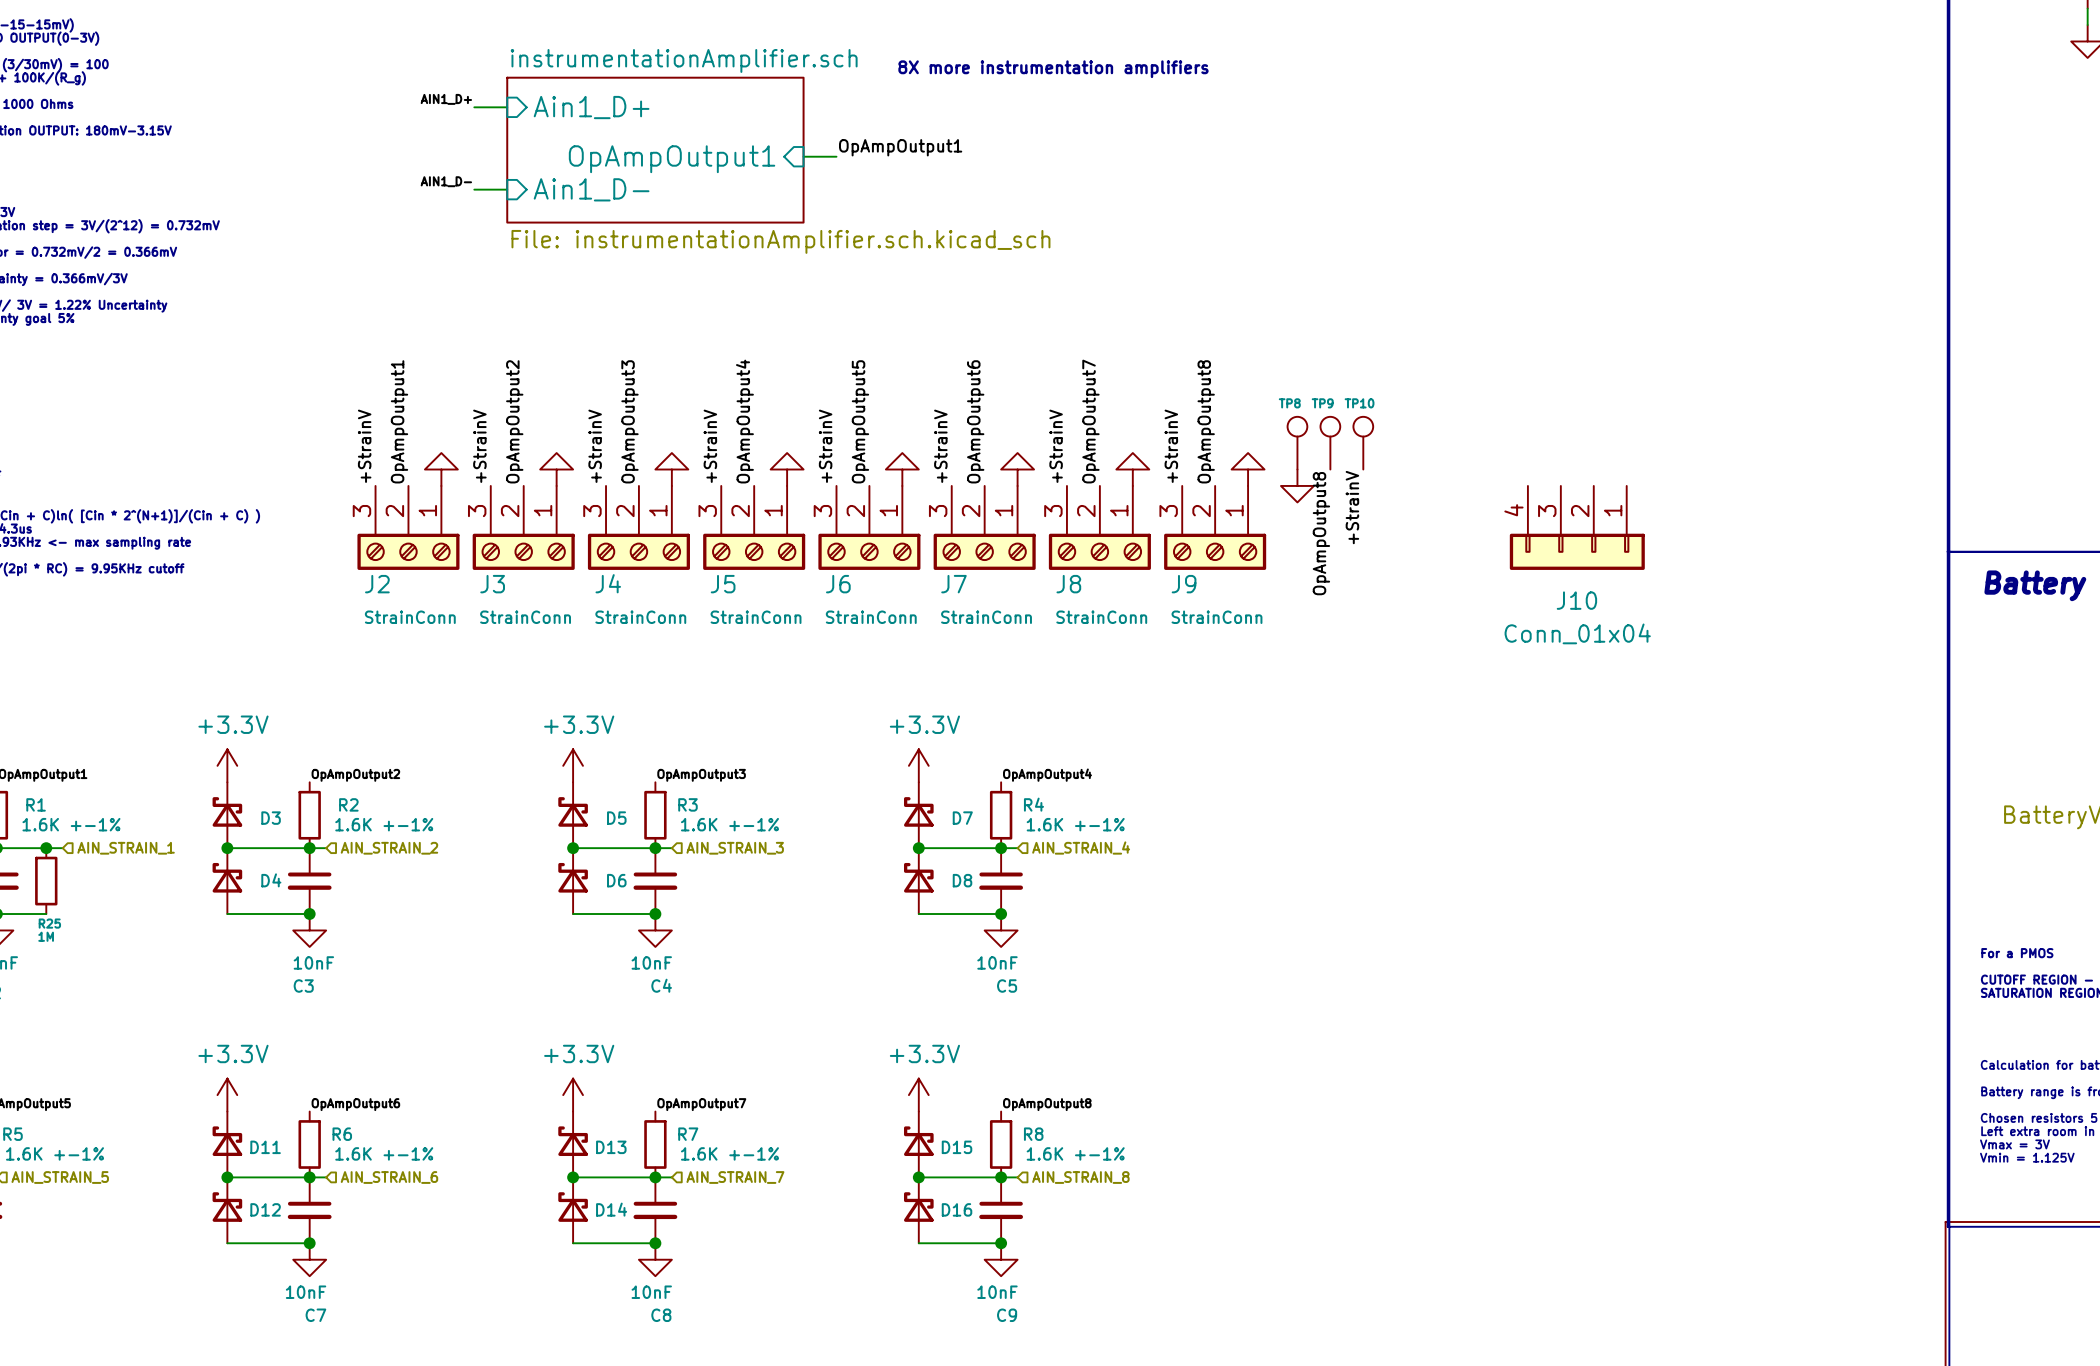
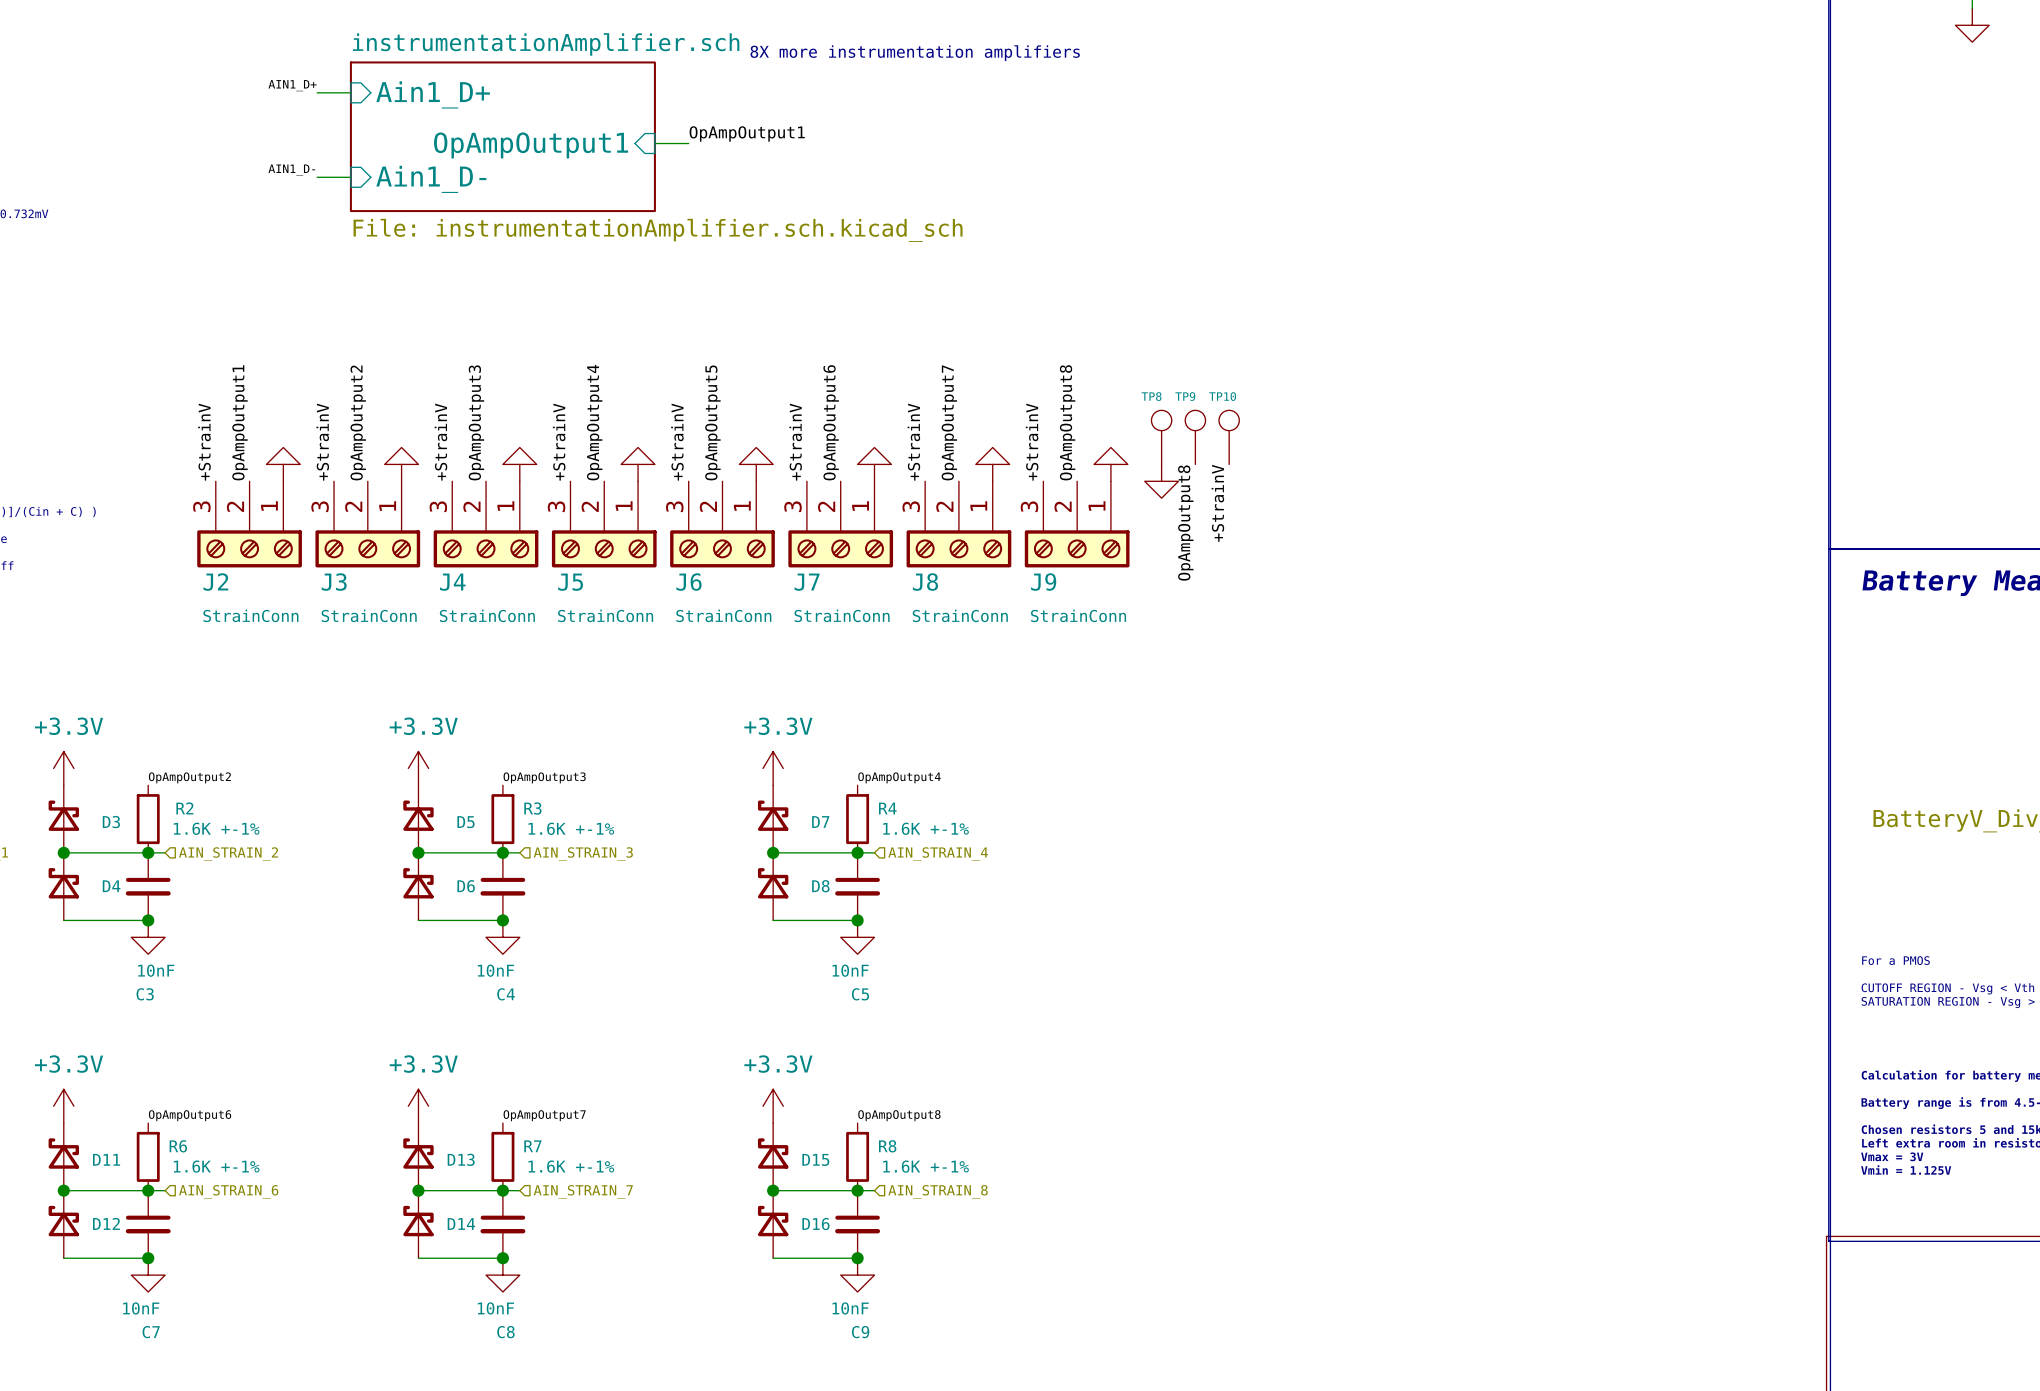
J10: Conn_01x04 (1577, 527) -> none

